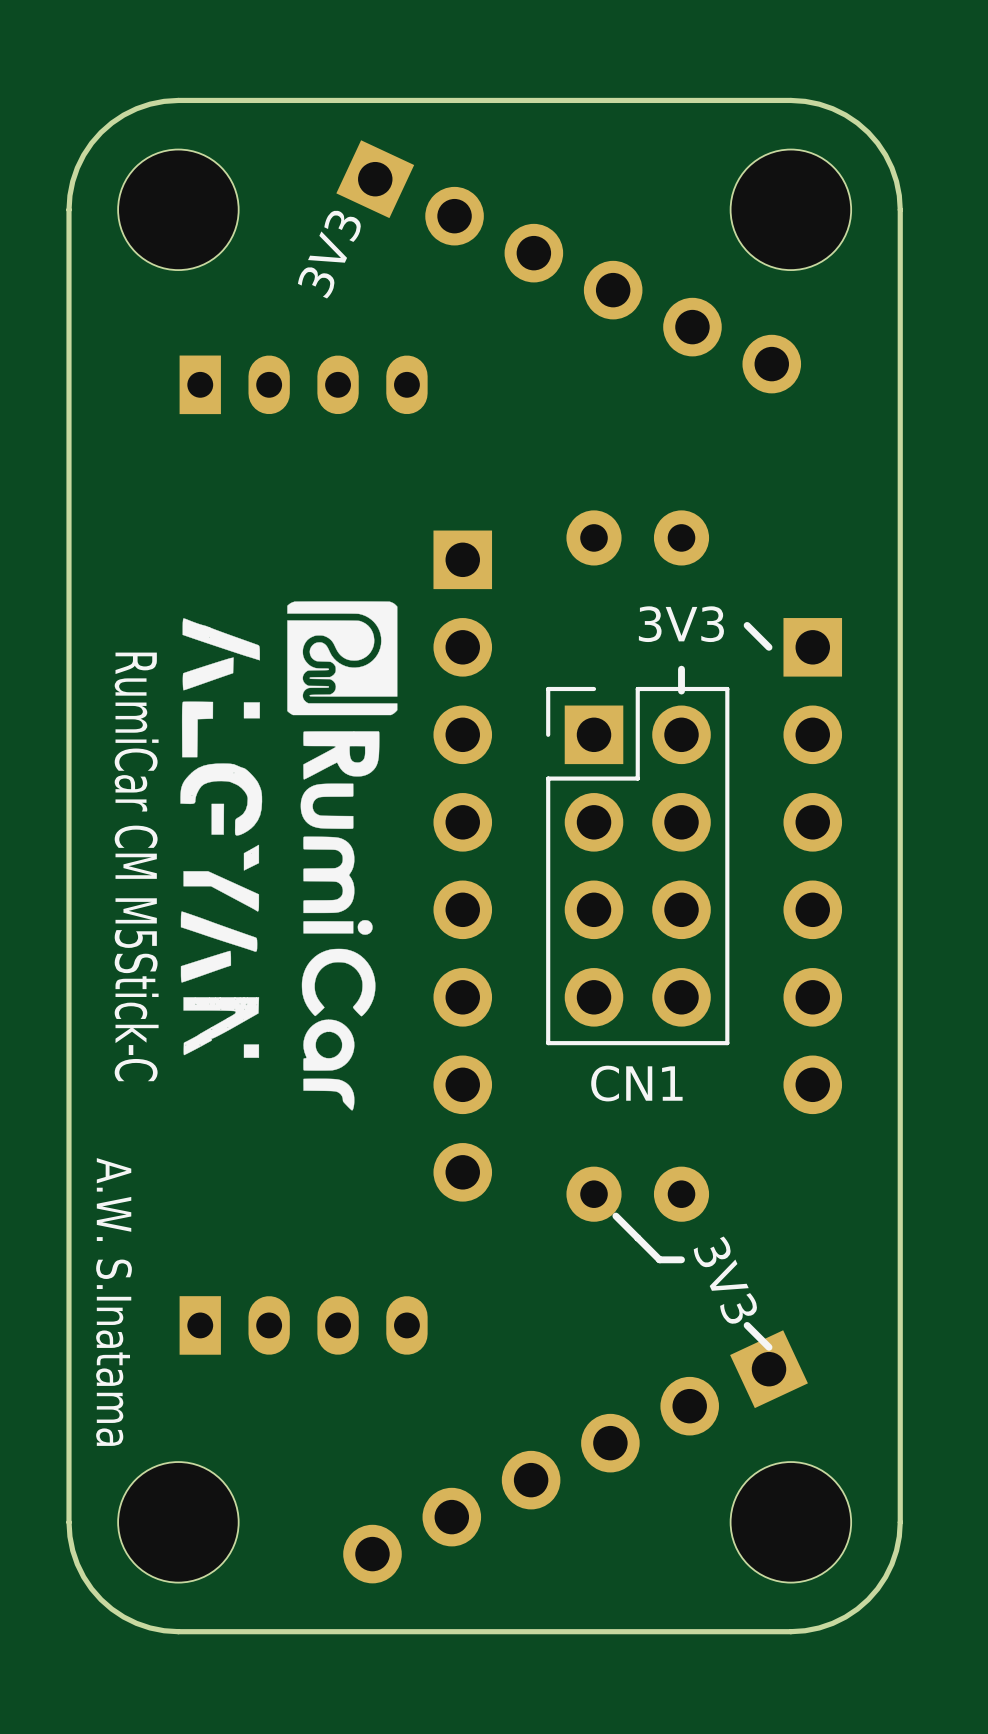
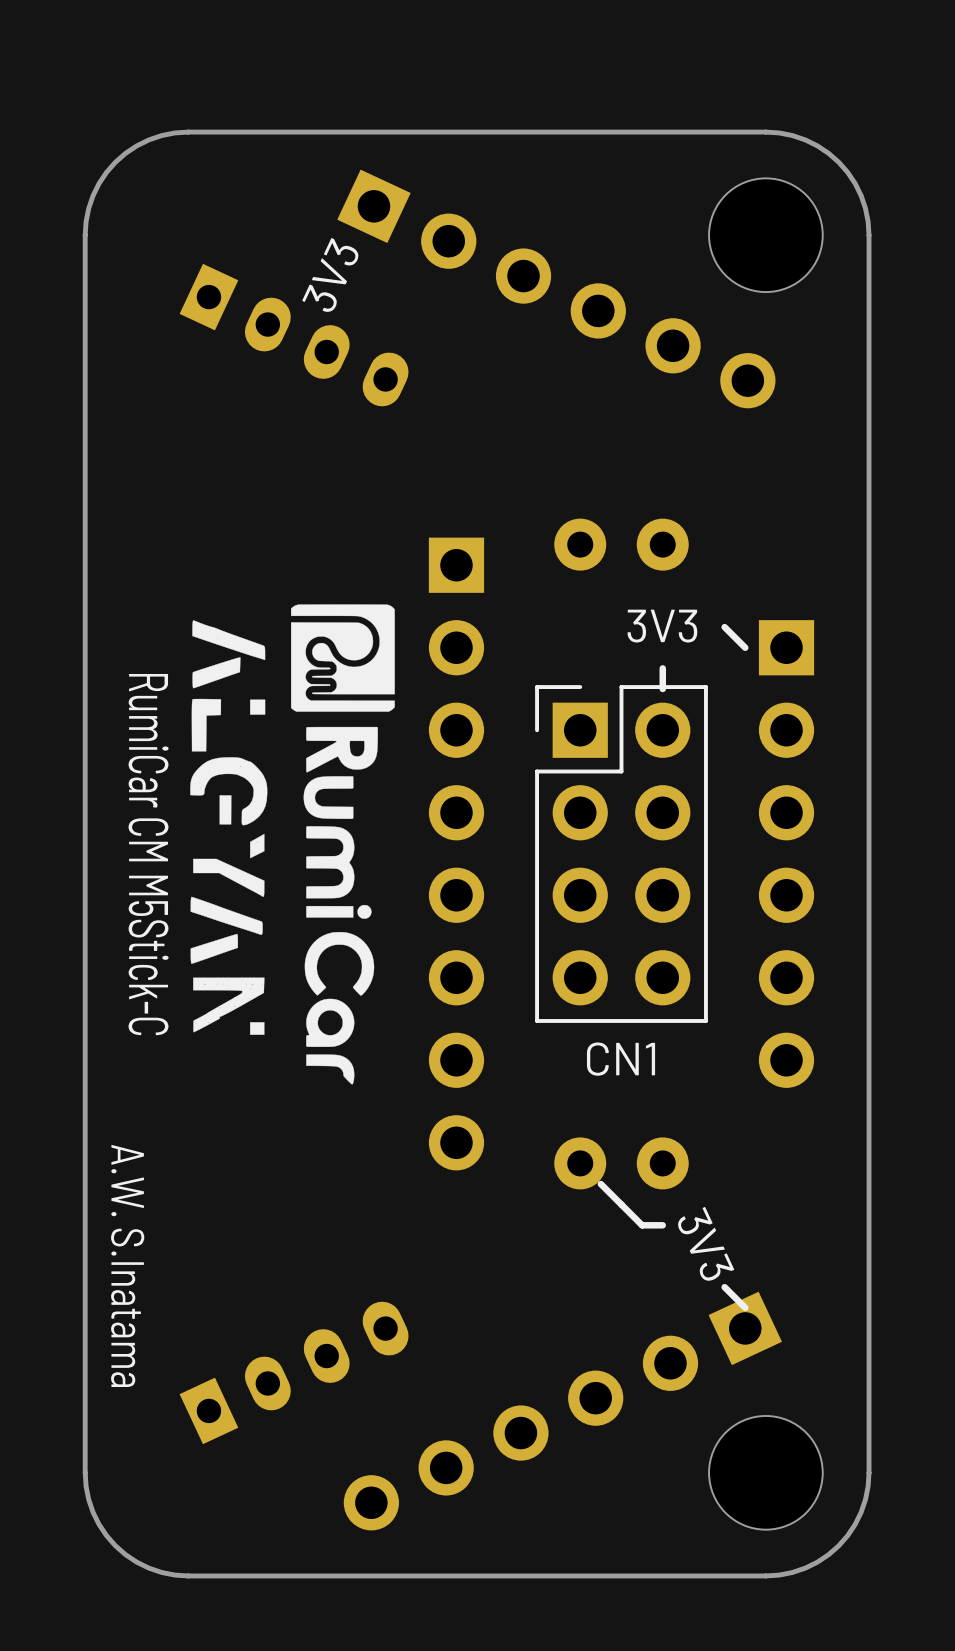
part: (178, 209) -> none
part: none -> (294, 335)
part: (303, 384) -> none
part: (303, 1325) -> none
part: none -> (294, 1372)
part: (178, 1522) -> none

